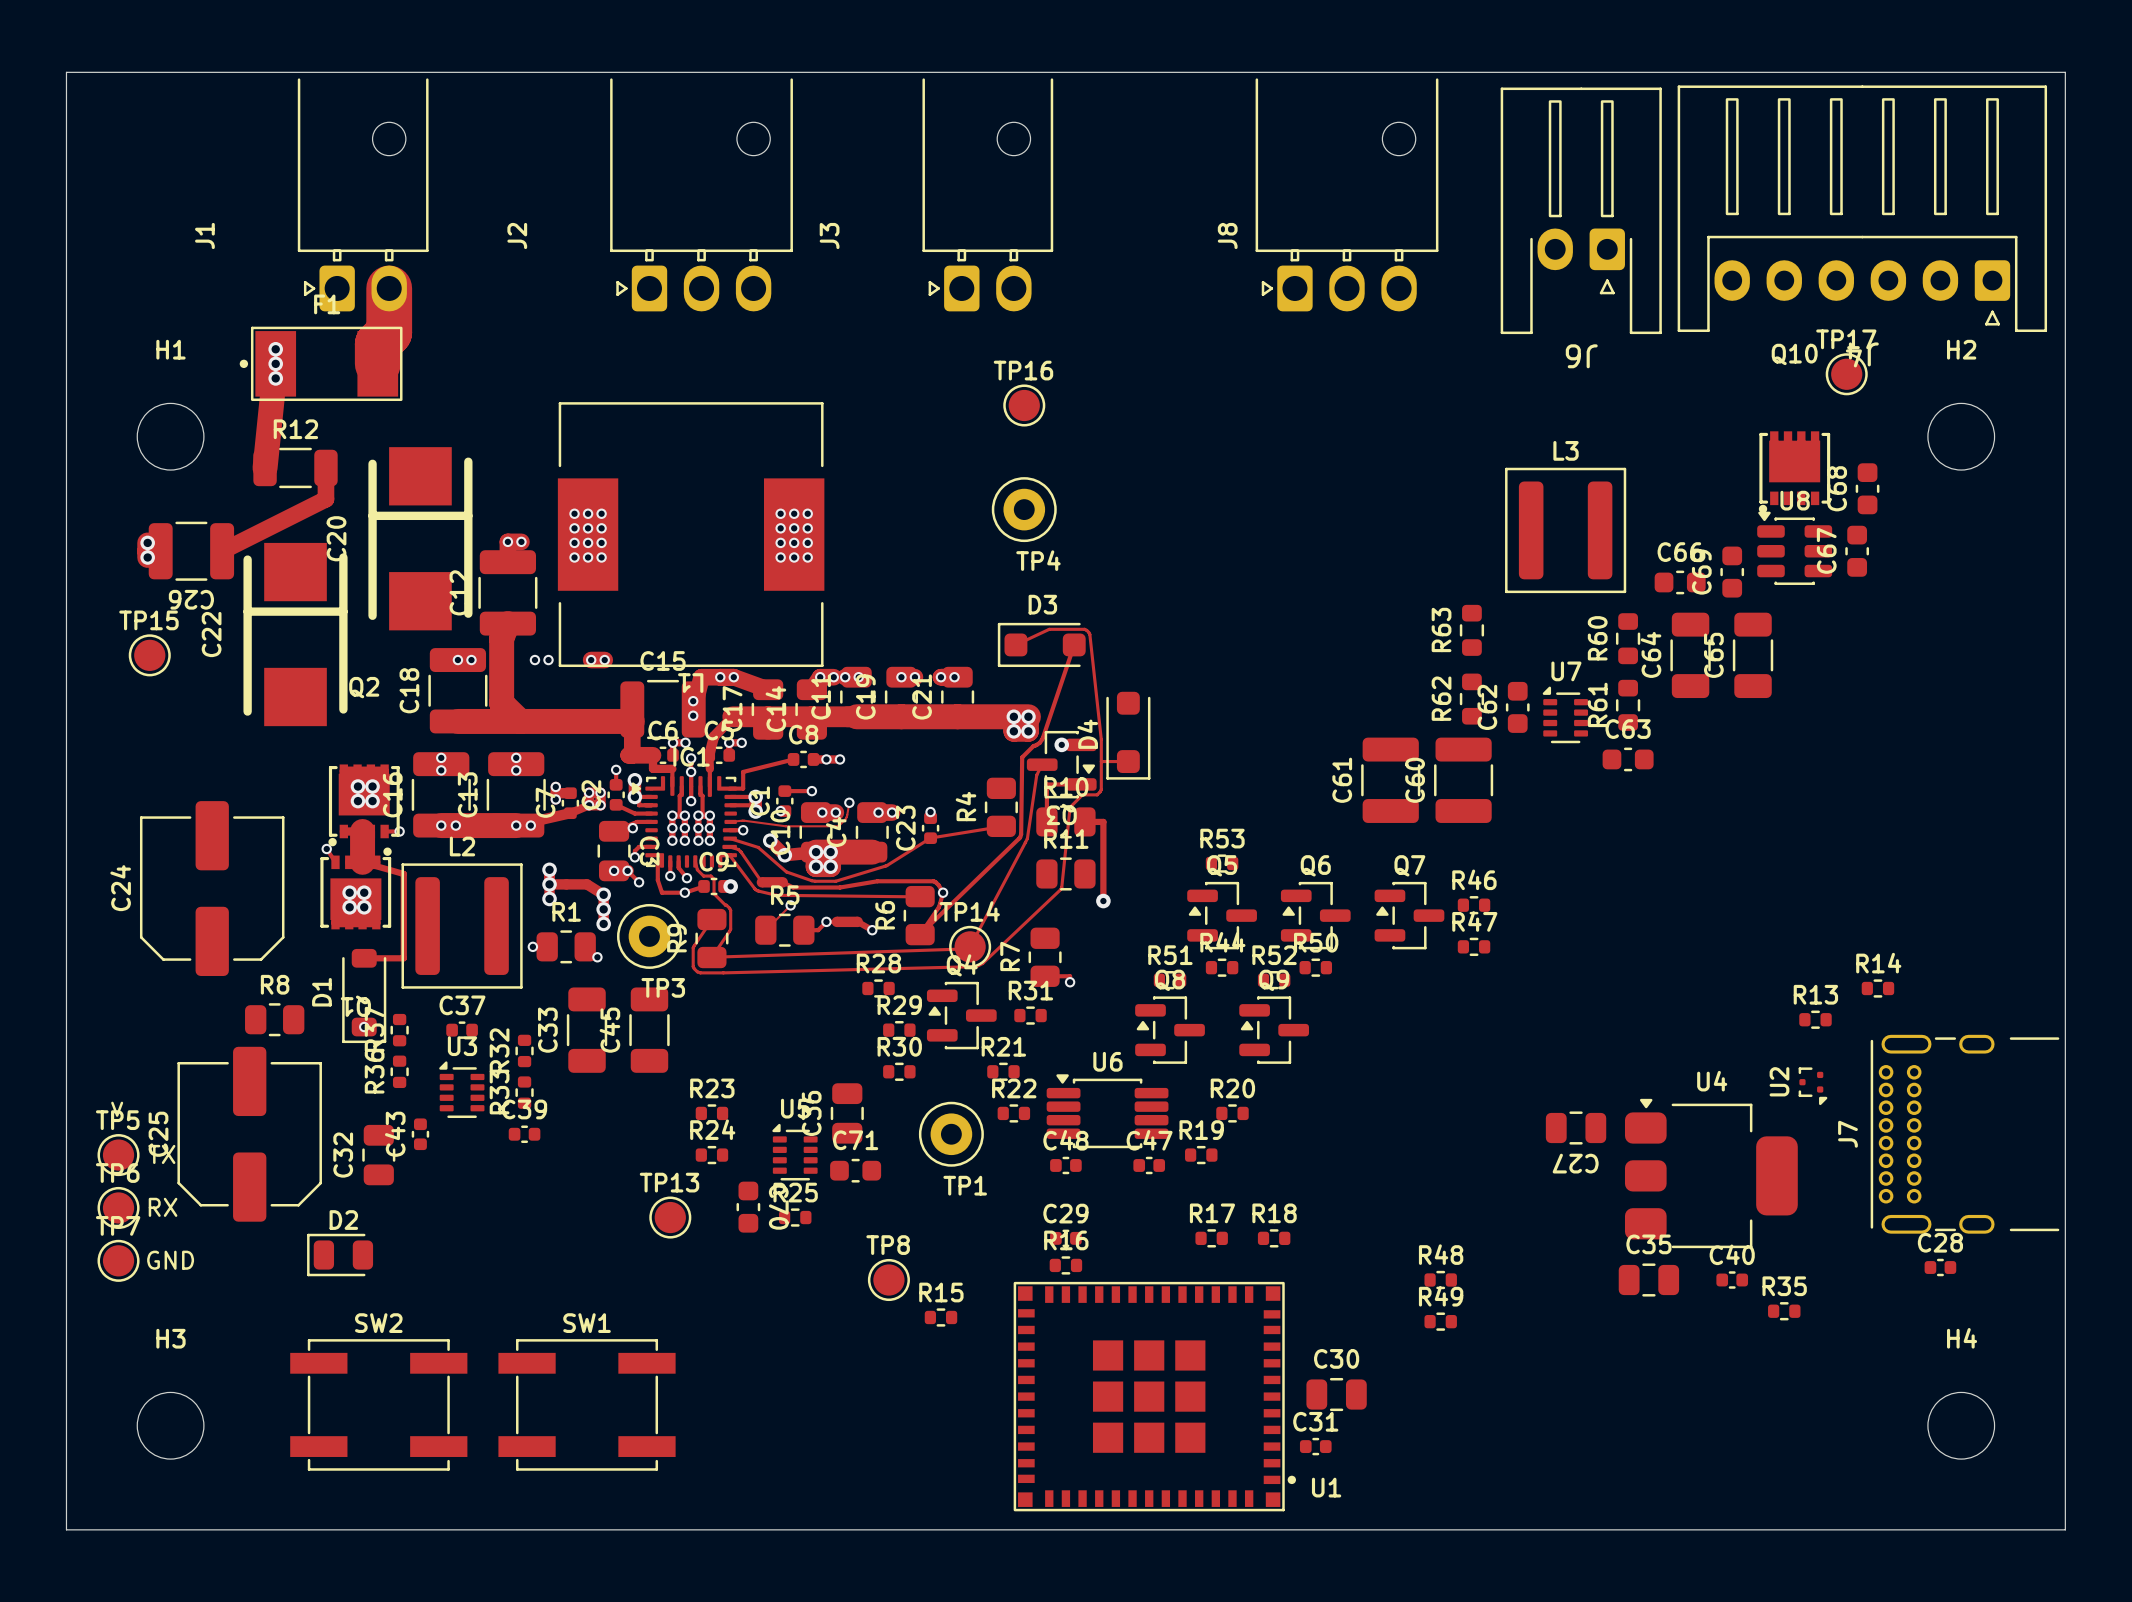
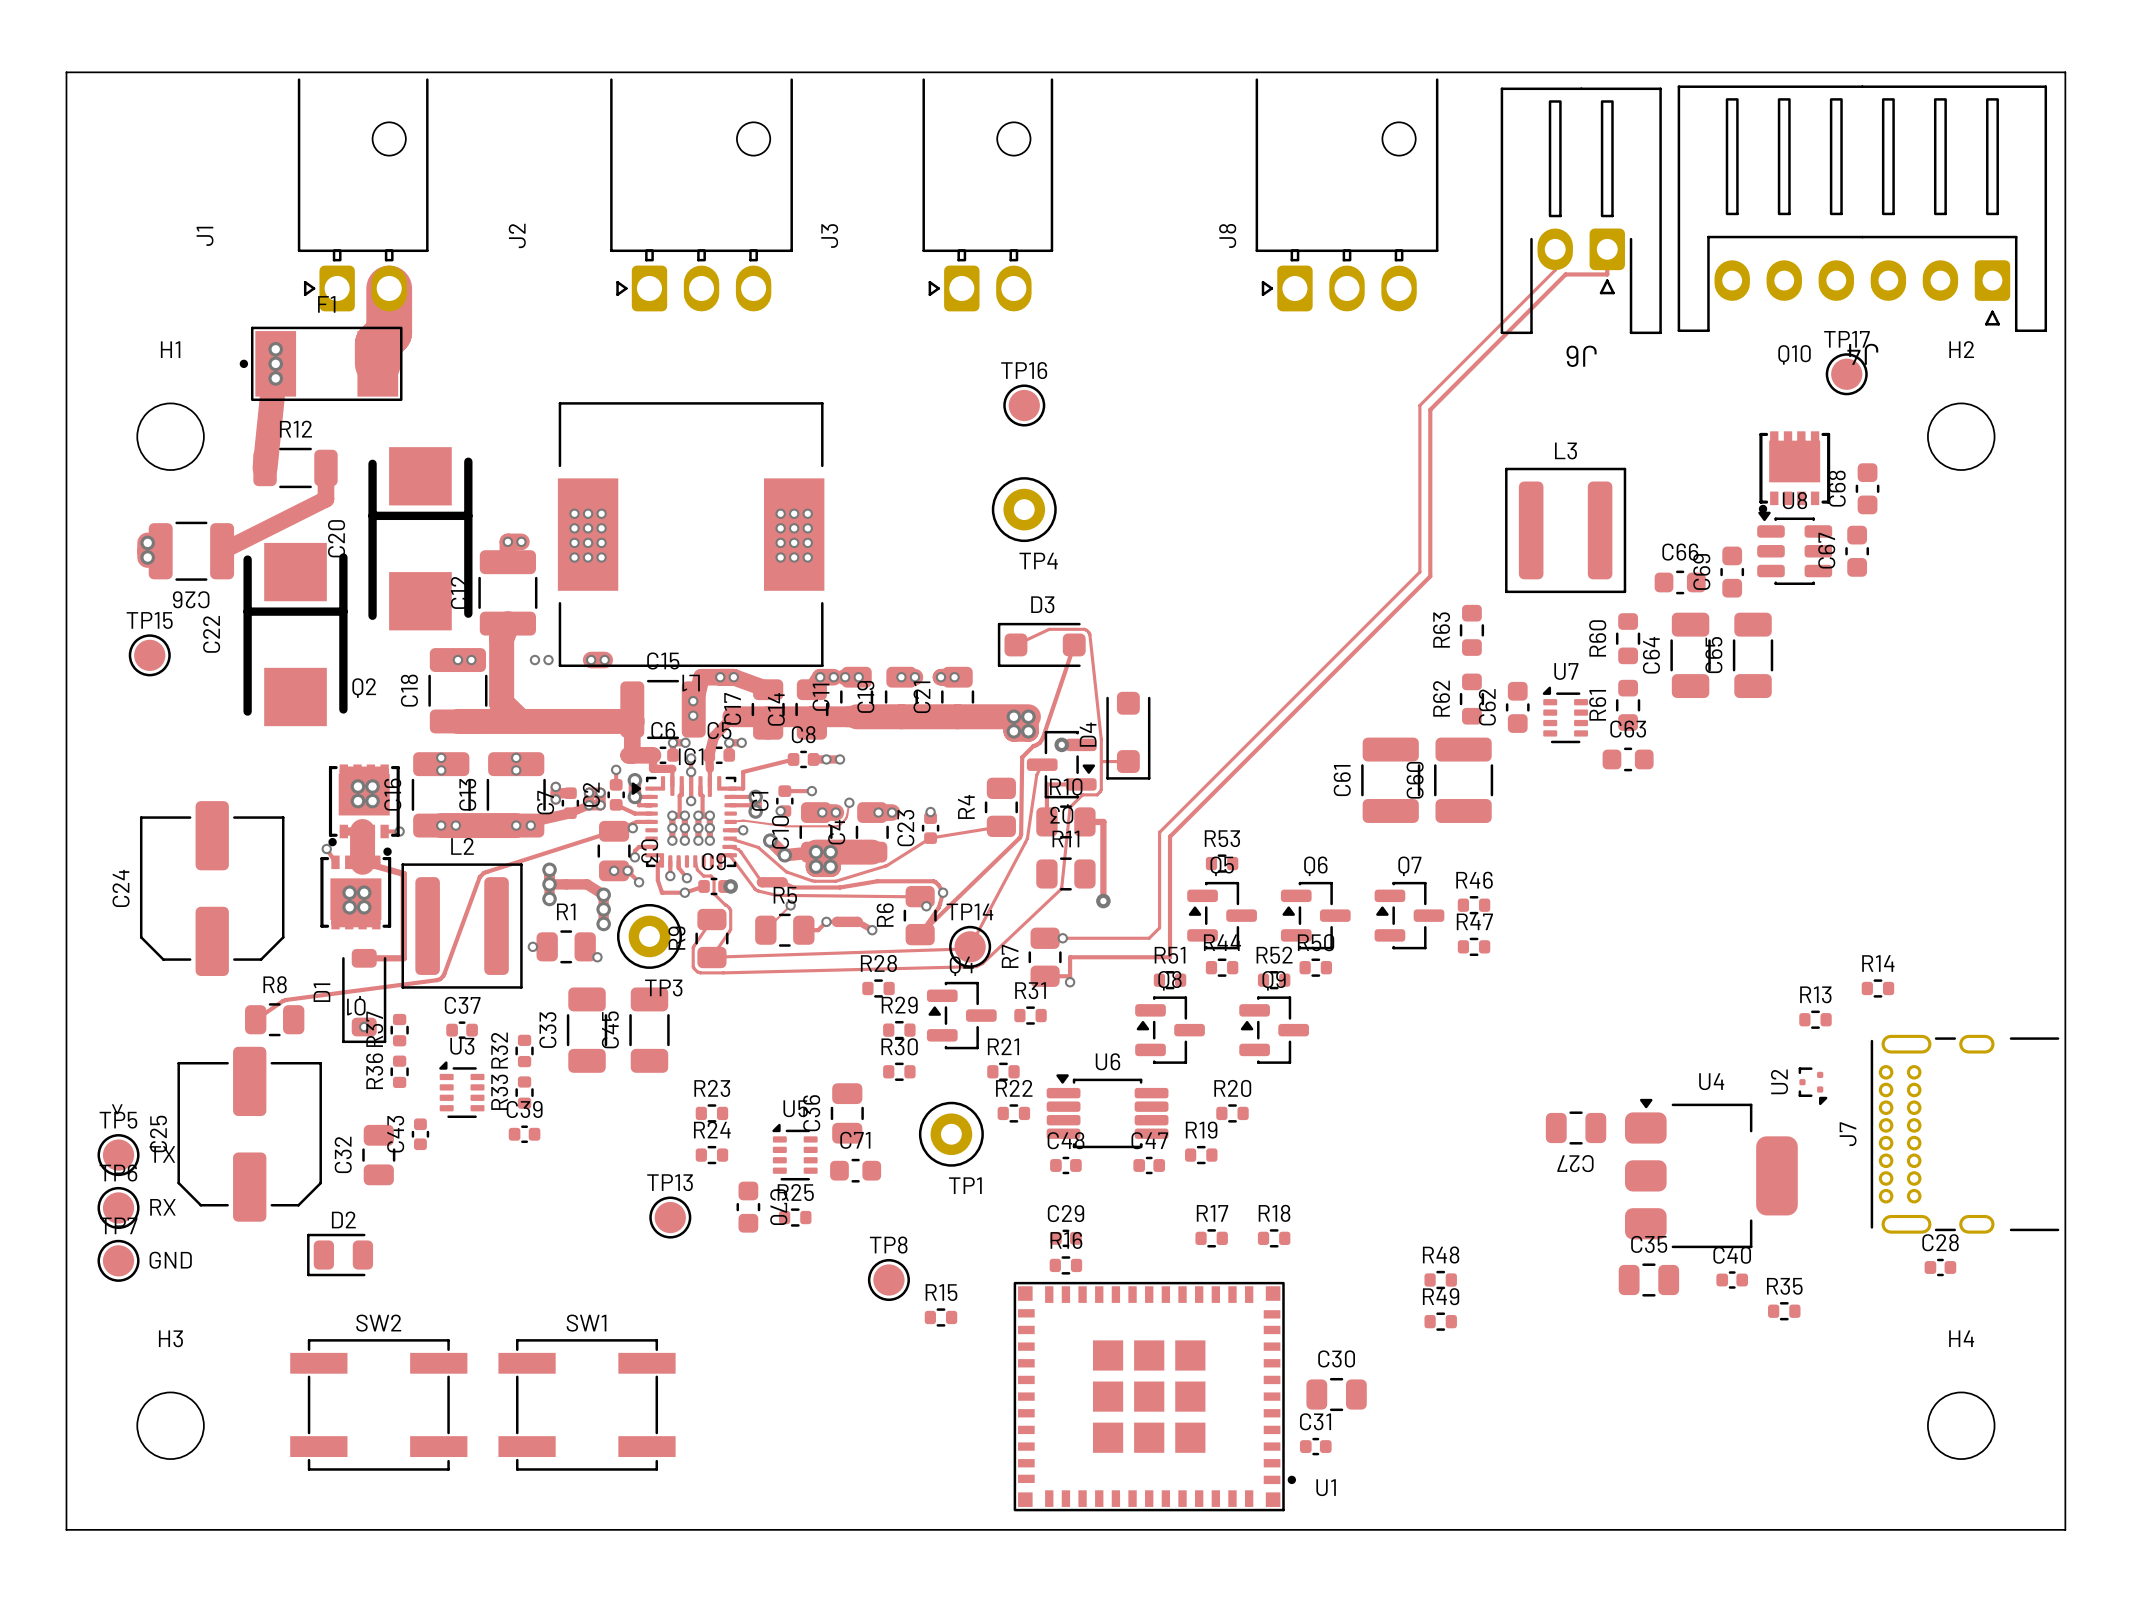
track: none -> (1555, 249) (1555, 270) (1419, 405) (1419, 572) (1159, 832) (1159, 927) (1149, 938) (1045, 938)
track: none -> (1607, 249) (1607, 274) (1565, 274) (1430, 409) (1430, 576) (1170, 836) (1170, 957) (1070, 957) (1070, 976)
track: none -> (614, 831) (483, 872) (479, 877) (444, 973) (440, 979) (286, 999) (255, 1019)
via: none -> (926, 906)
via: none -> (1062, 938)

